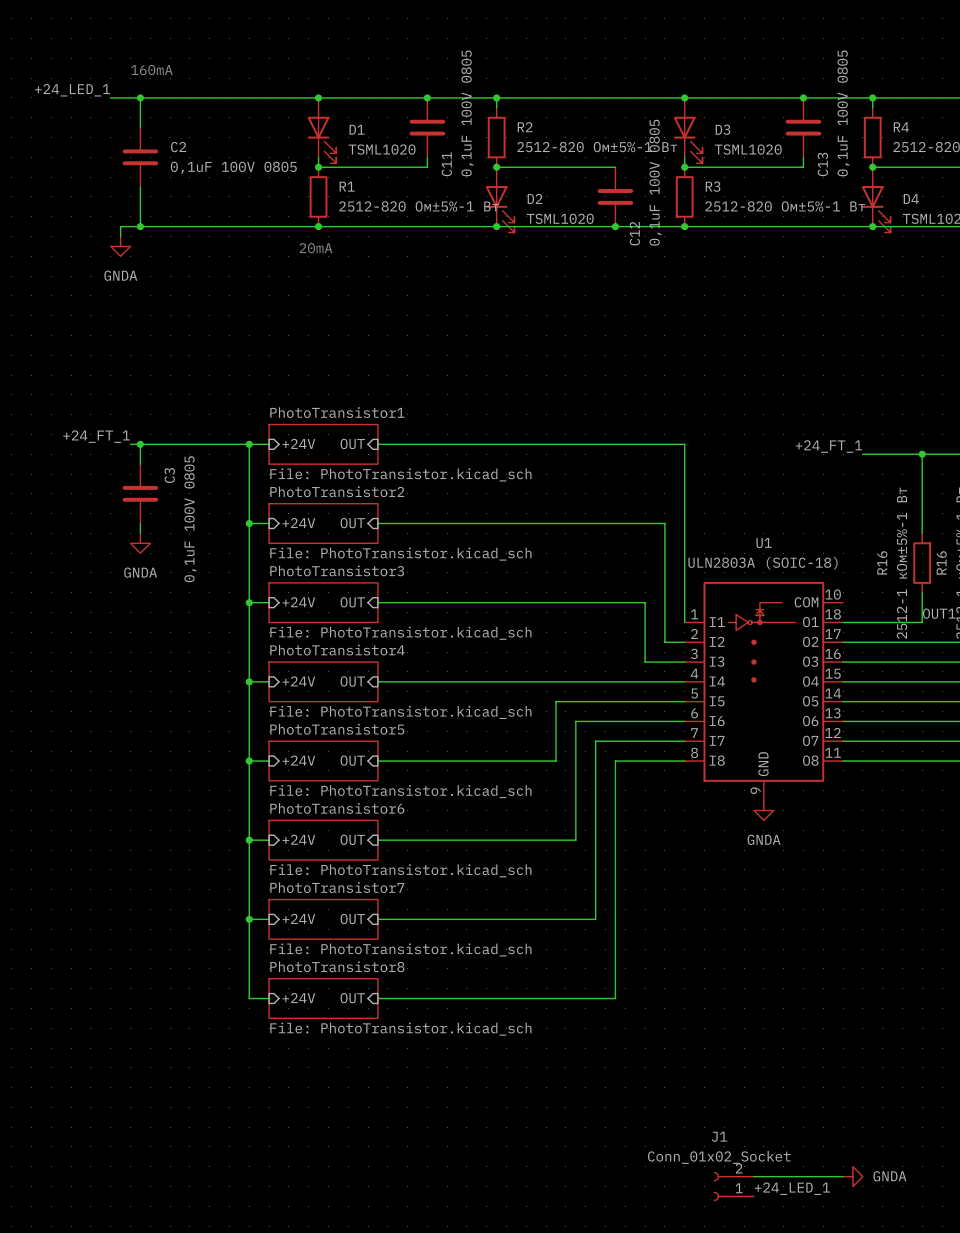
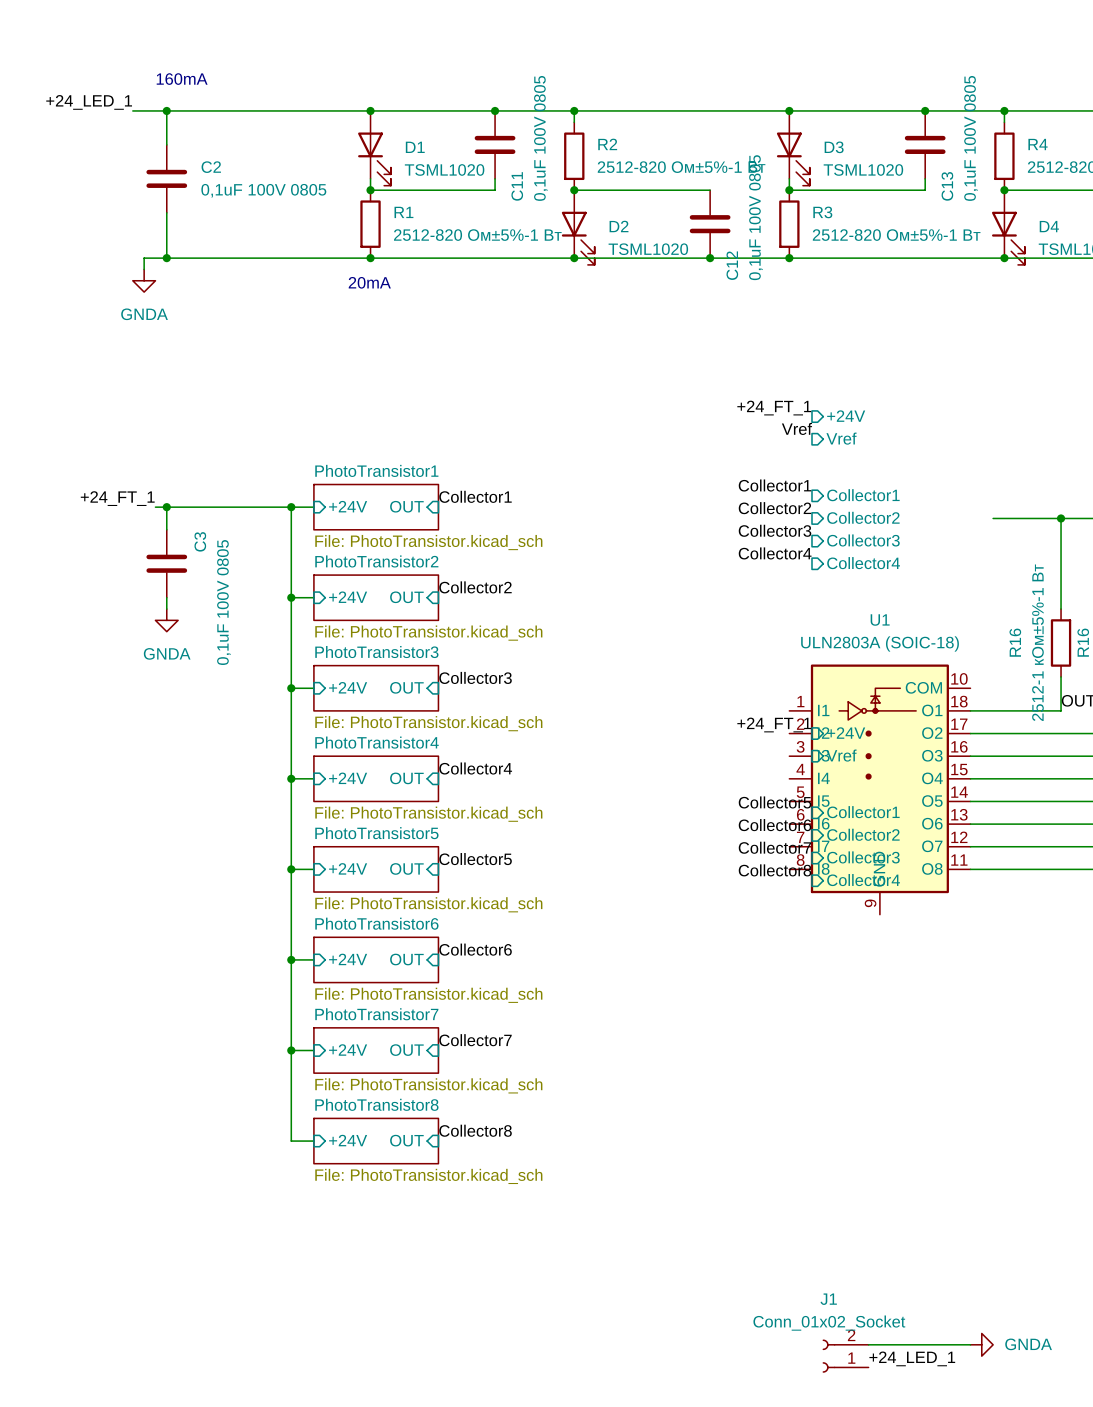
label: none -> +24_FT_1 (774, 408)
sheet pin: none -> +24V (846, 416)
label: none -> Vref (796, 428)
sheet pin: none -> Vref (841, 438)
label: none -> Collector1 (774, 485)
sheet pin: none -> Collector1 (863, 495)
label: none -> Collector1 (475, 496)
wire: (377, 444) (684, 444) (684, 622) -> none
label: none -> Collector2 (774, 508)
label: +24_FT_1 (828, 446) -> none
sheet pin: none -> Collector2 (863, 517)
label: none -> Collector3 (775, 530)
sheet pin: none -> Collector3 (863, 540)
label: none -> Collector4 (775, 553)
sheet pin: none -> Collector4 (863, 563)
label: none -> Collector2 (475, 587)
wire: (377, 523) (664, 523) (664, 642) (684, 642) -> none
label: none -> Collector3 (475, 677)
wire: (377, 602) (645, 602) (645, 662) (684, 662) -> none
label: none -> +24_FT_1 (774, 725)
sheet pin: none -> +24V (846, 733)
sheet pin: none -> Vref (841, 755)
label: none -> Collector4 (475, 768)
wire: (377, 681) (684, 681) -> none
wire: (684, 701) (556, 701) (556, 761) (377, 761) -> none
label: none -> Collector5 (775, 802)
sheet pin: none -> Collector1 (863, 812)
wire: (684, 721) (575, 721) (575, 840) (377, 840) -> none
label: none -> Collector6 (775, 825)
sheet pin: none -> Collector2 (863, 834)
wire: (684, 741) (595, 741) (595, 919) (377, 919) -> none
label: none -> Collector7 (774, 847)
sheet pin: none -> Collector3 (863, 857)
label: none -> Collector5 (475, 859)
label: none -> Collector8 (775, 870)
wire: (684, 761) (615, 761) (615, 998) (377, 998) -> none
sheet pin: none -> Collector4 (863, 880)
power symbol: GNDA (763, 810) -> none
label: none -> Collector6 (475, 949)
label: none -> Collector7 (475, 1040)
label: none -> Collector8 (475, 1130)

